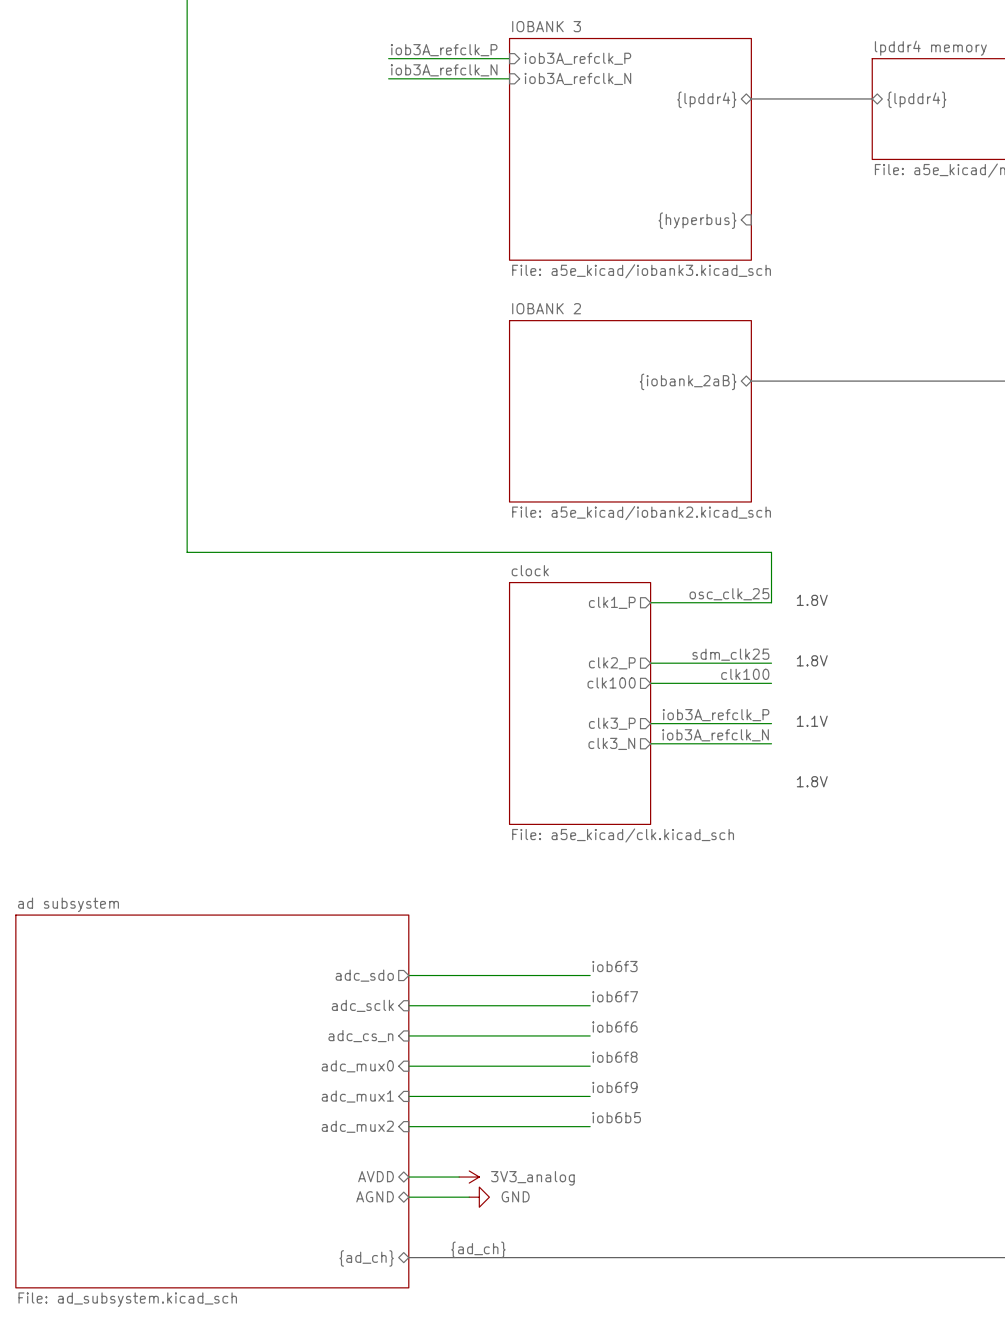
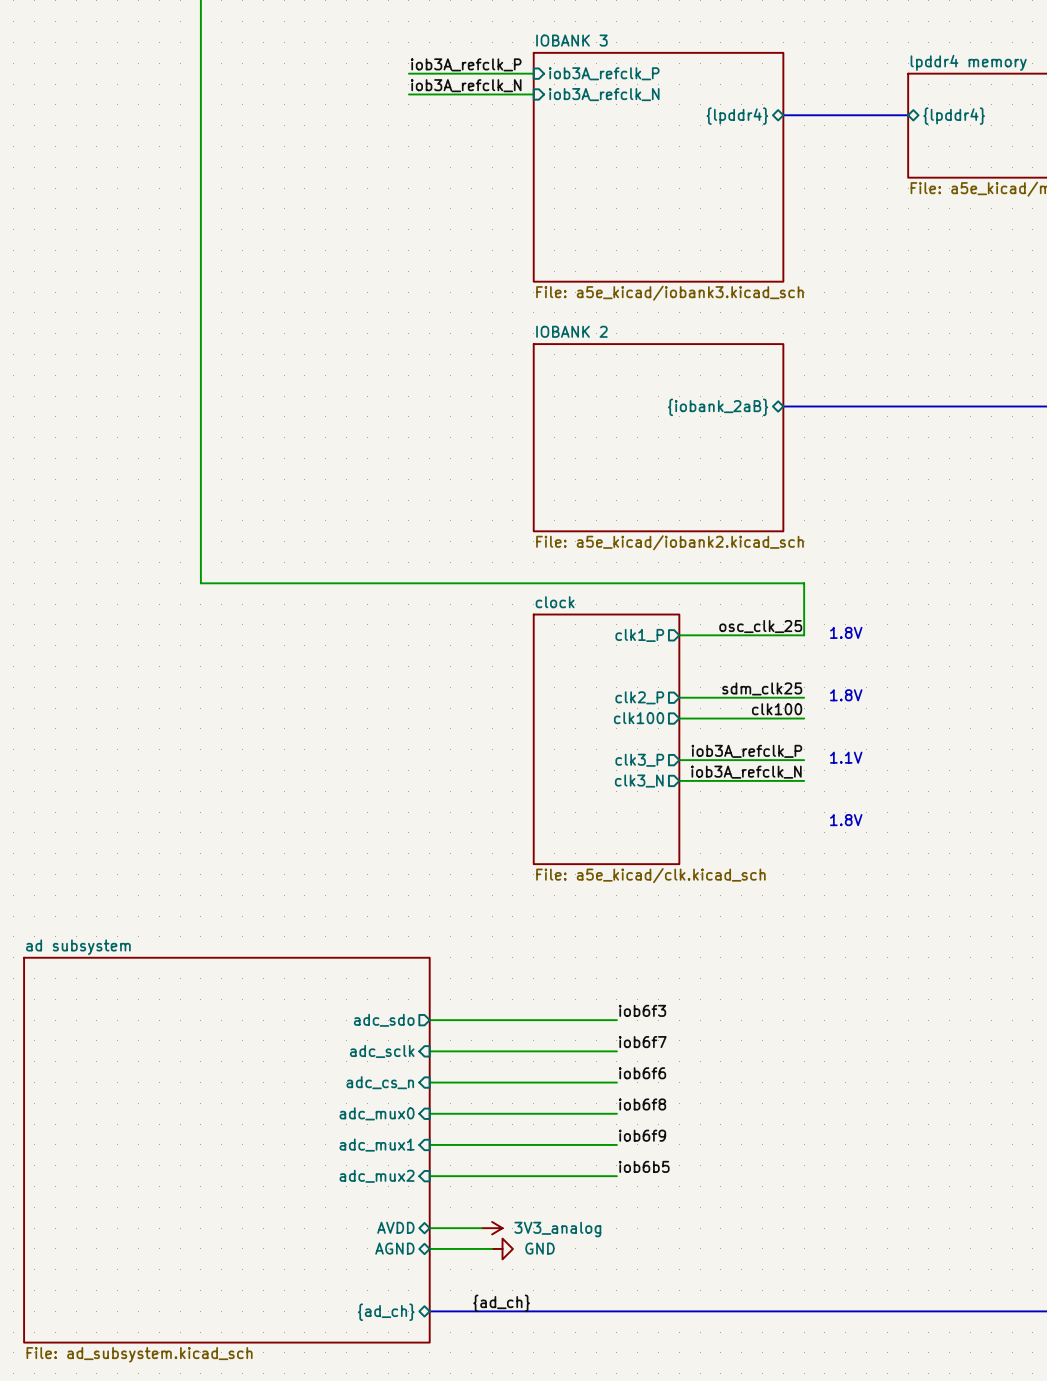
sheet pin: {hyperbus} (697, 220) -> none

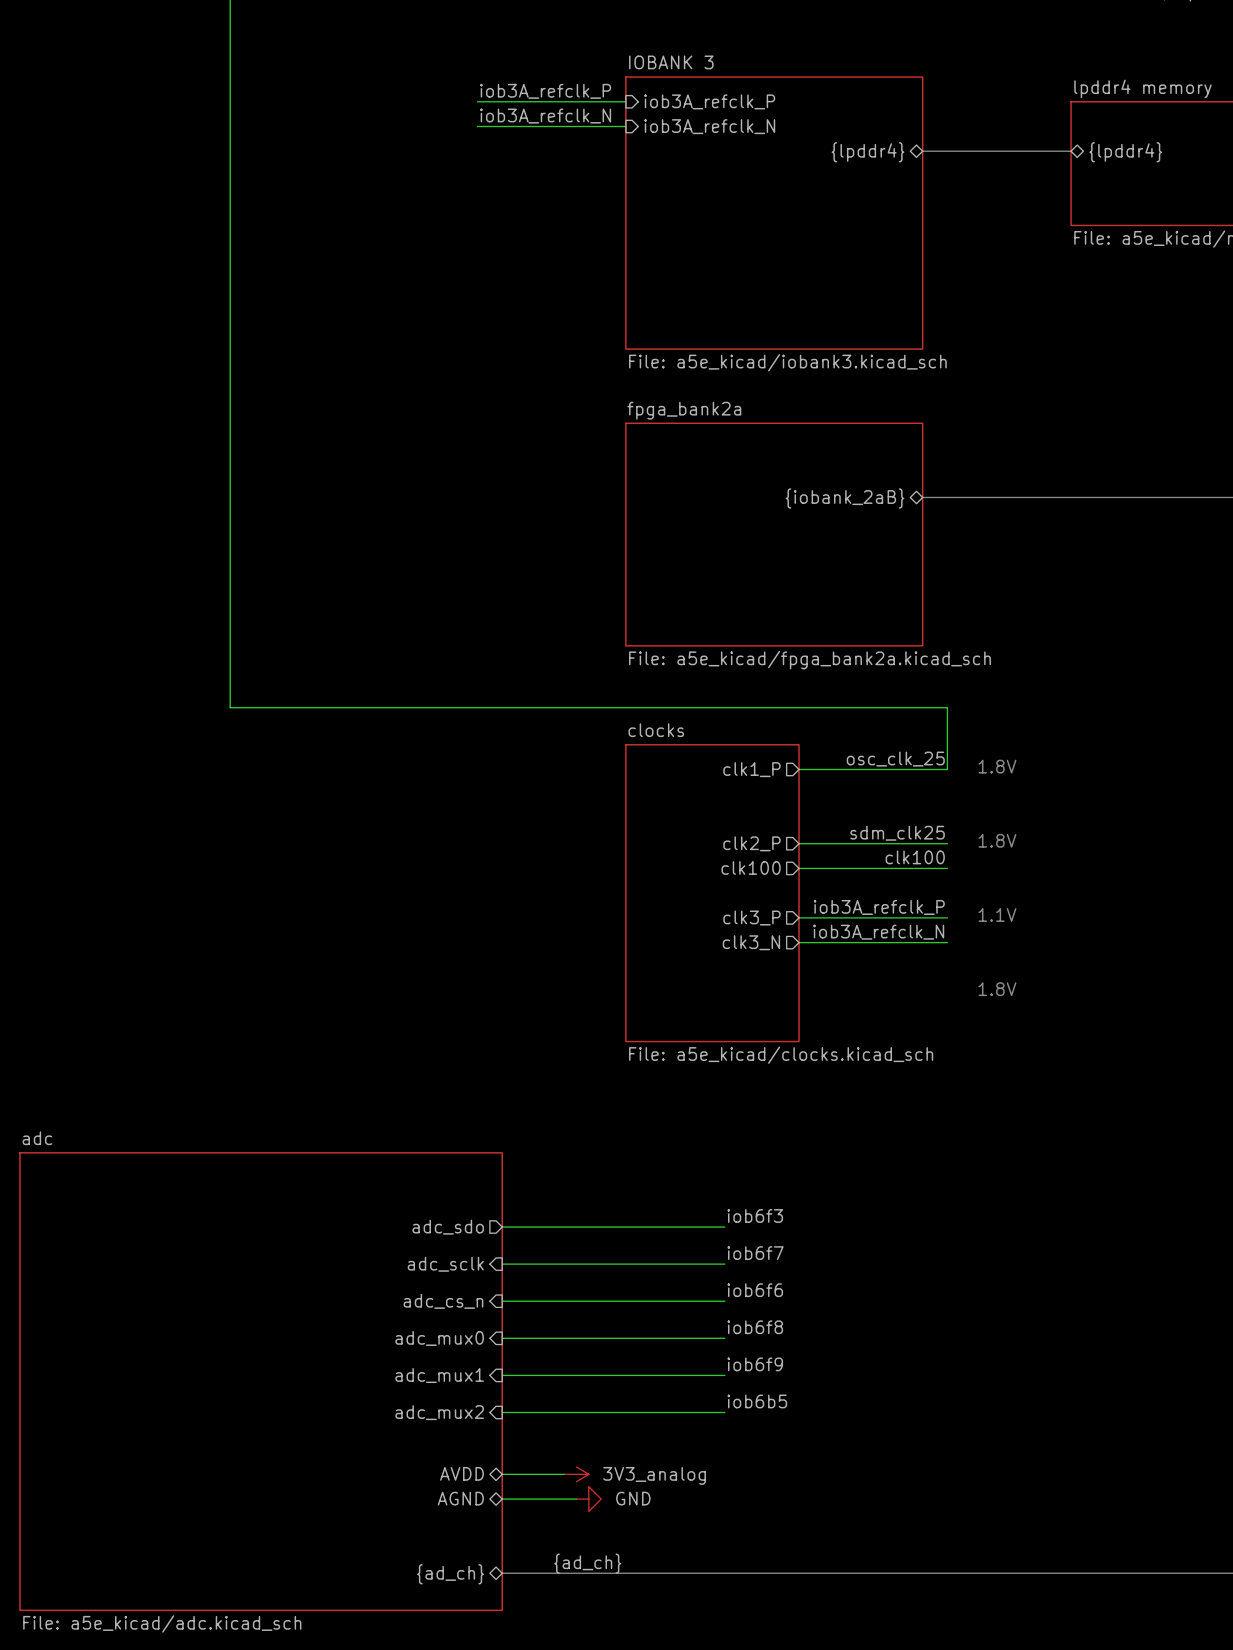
sheet IOBANK 2 name: IOBANK 2 (571, 331) -> fpga_bank2a (684, 410)
sheet IOBANK 2 value: File: a5e_kicad/iobank2.kicad_sch (670, 542) -> File: a5e_kicad/fpga_bank2a.kicad_sch (809, 660)
sheet clock name: clock (555, 602) -> clocks (656, 730)
sheet clock value: File: a5e_kicad/clk.kicad_sch (650, 875) -> File: a5e_kicad/clocks.kicad_sch (781, 1055)
sheet ad subsystem name: ad subsystem (78, 947) -> adc (37, 1138)
sheet ad subsystem value: File: ad_subsystem.kicad_sch (139, 1354) -> File: a5e_kicad/adc.kicad_sch (162, 1623)

